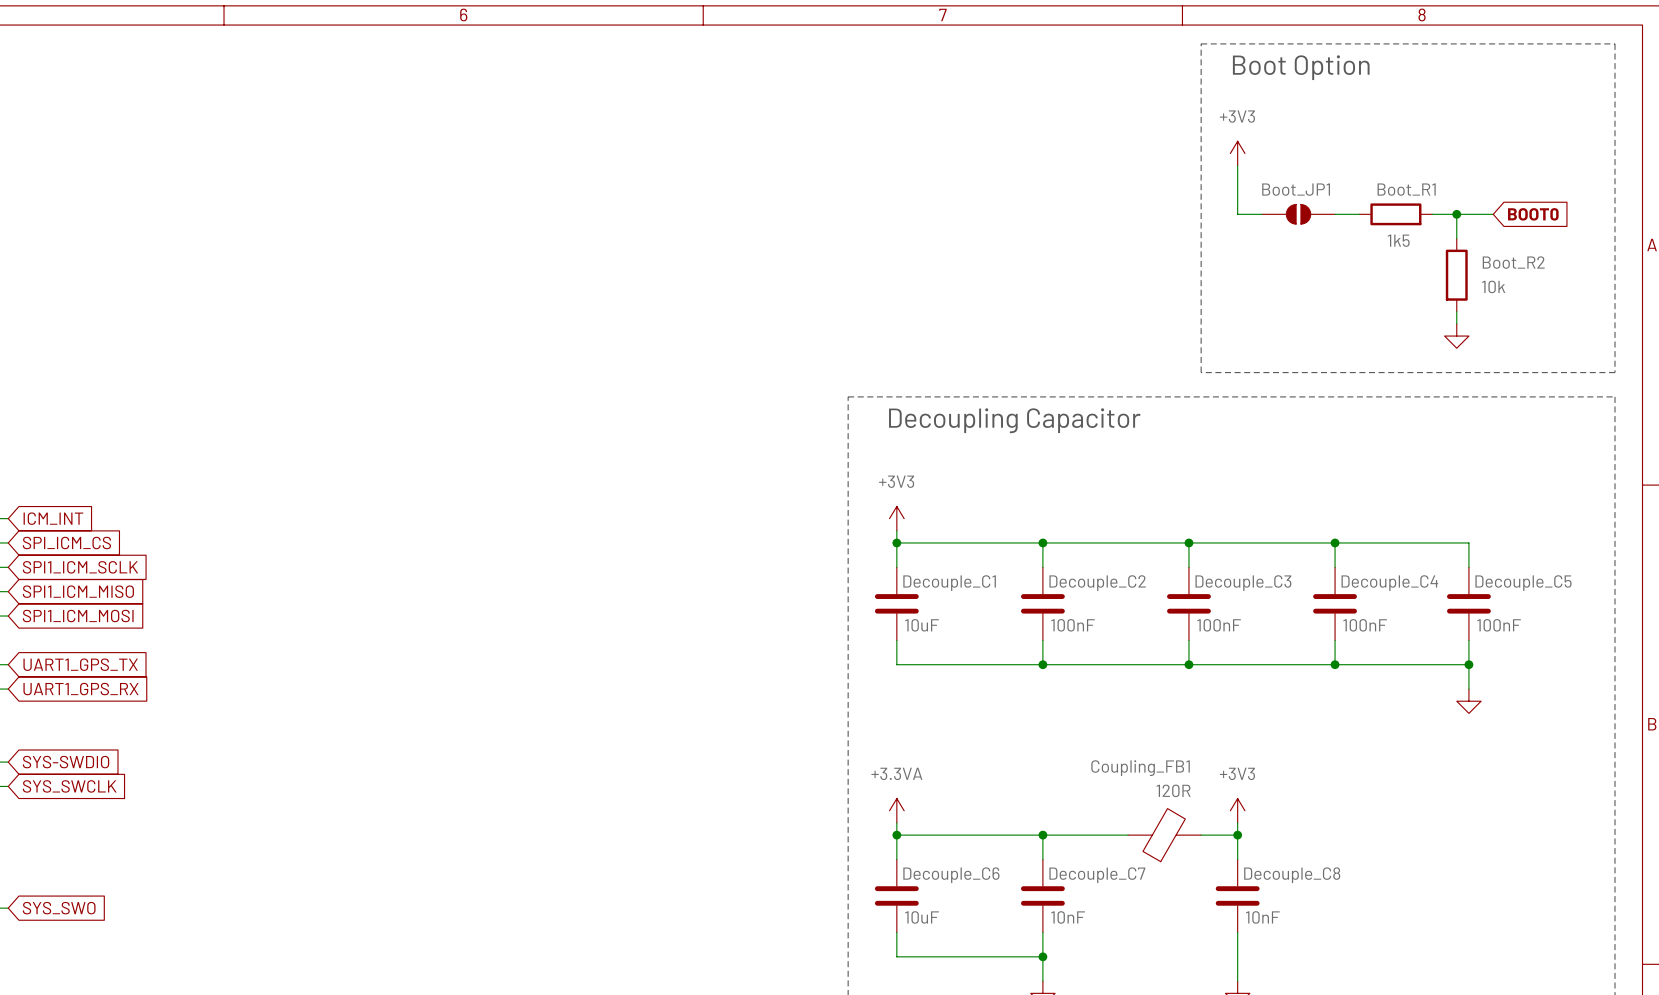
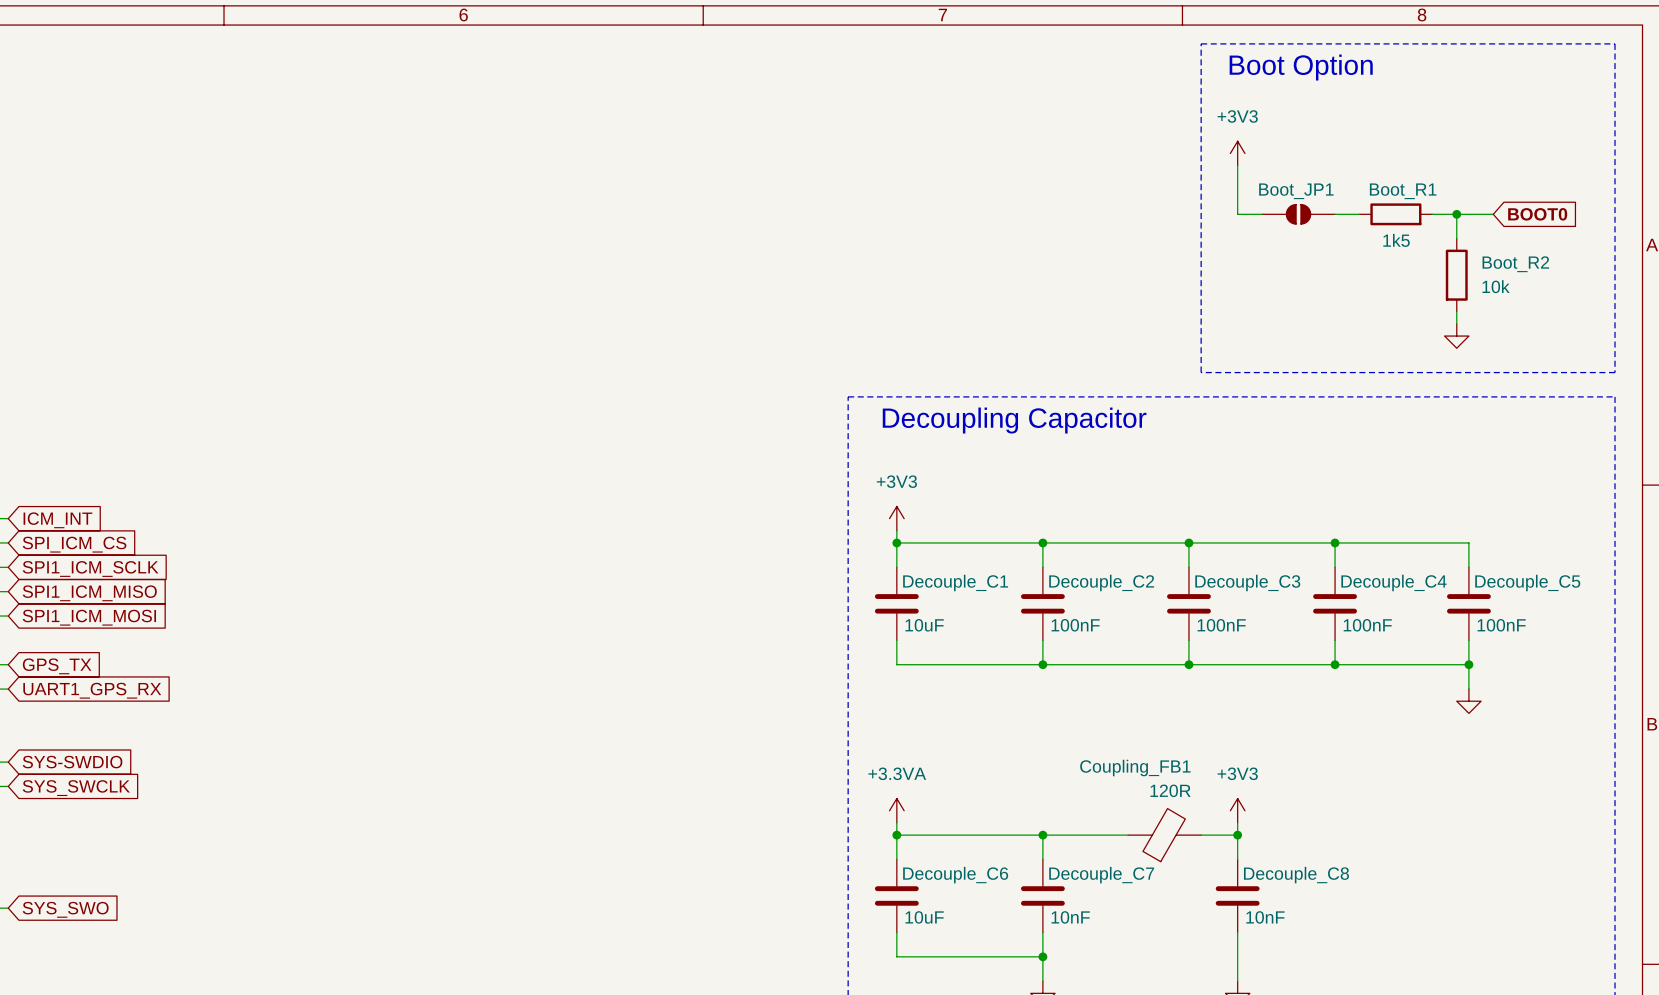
global label: UART1_GPS_TX (80, 664) -> GPS_TX (57, 666)

